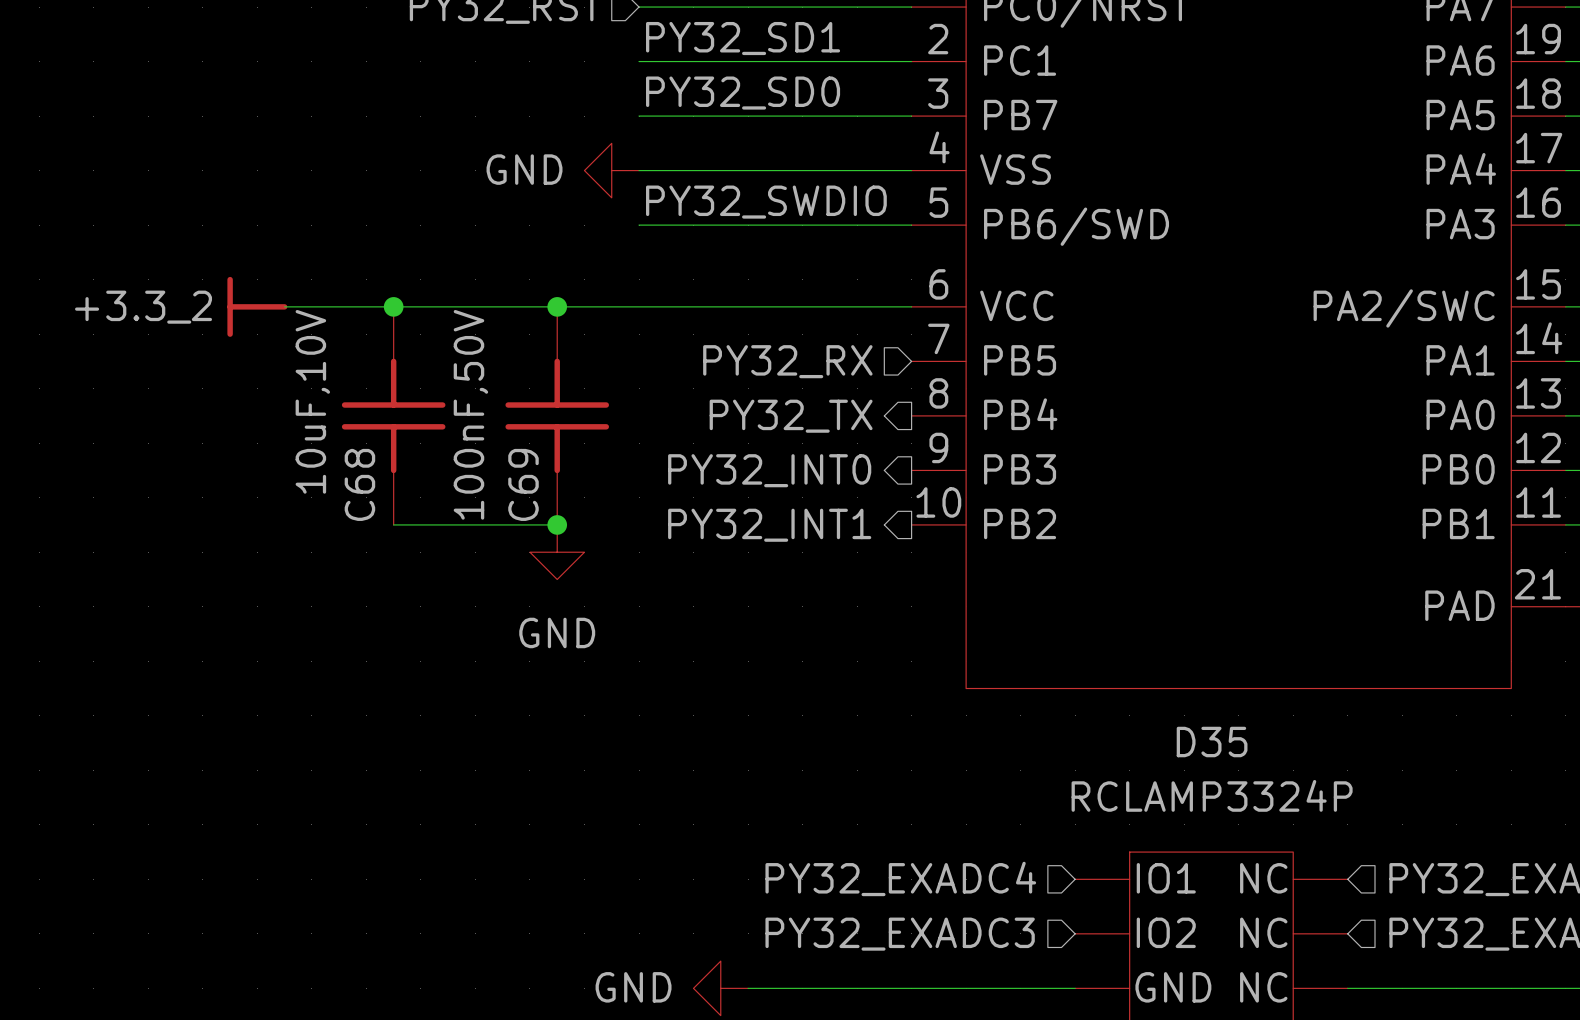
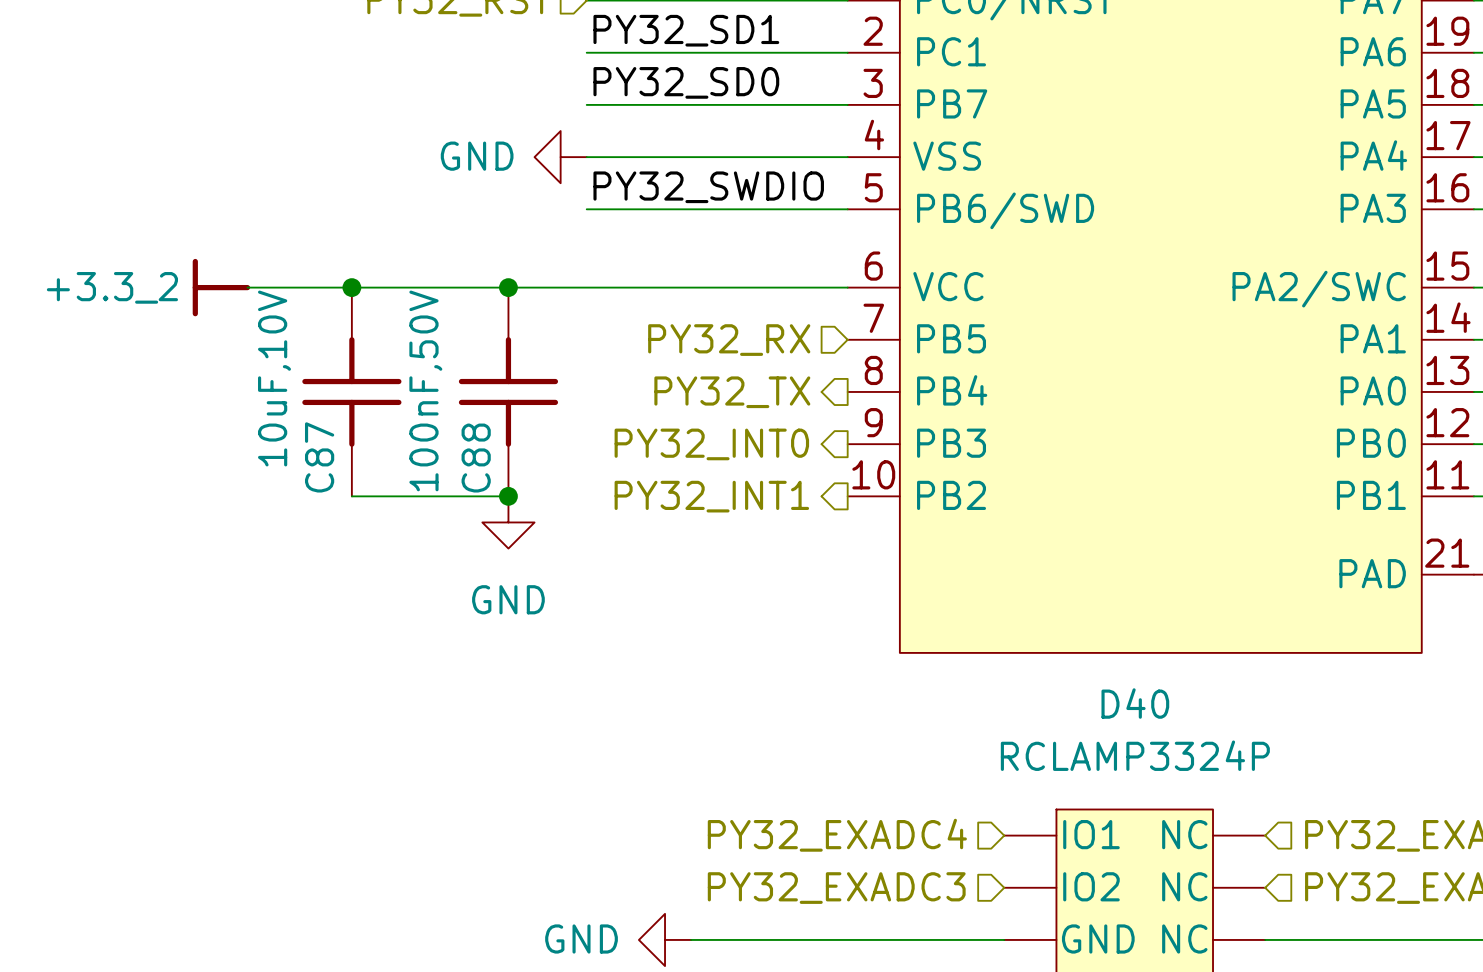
C68 name: C68 (359, 484) -> C87 (319, 457)
C69 name: C69 (523, 484) -> C88 (476, 458)
D35 name: D35 (1212, 742) -> D40 (1135, 703)

